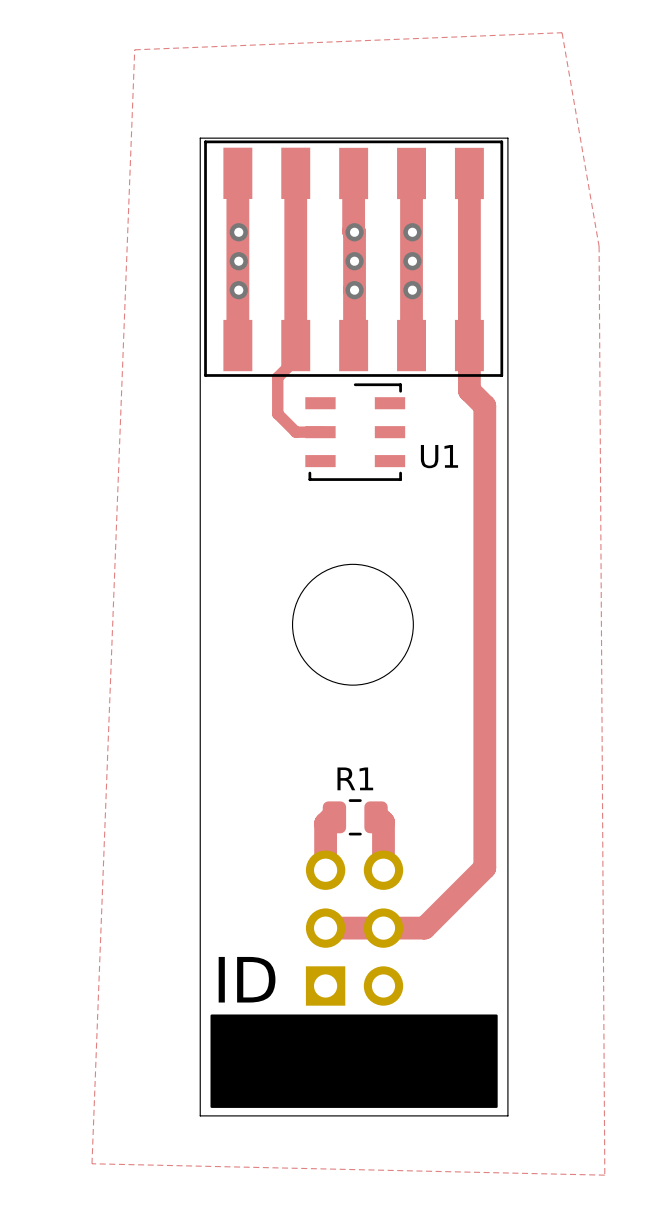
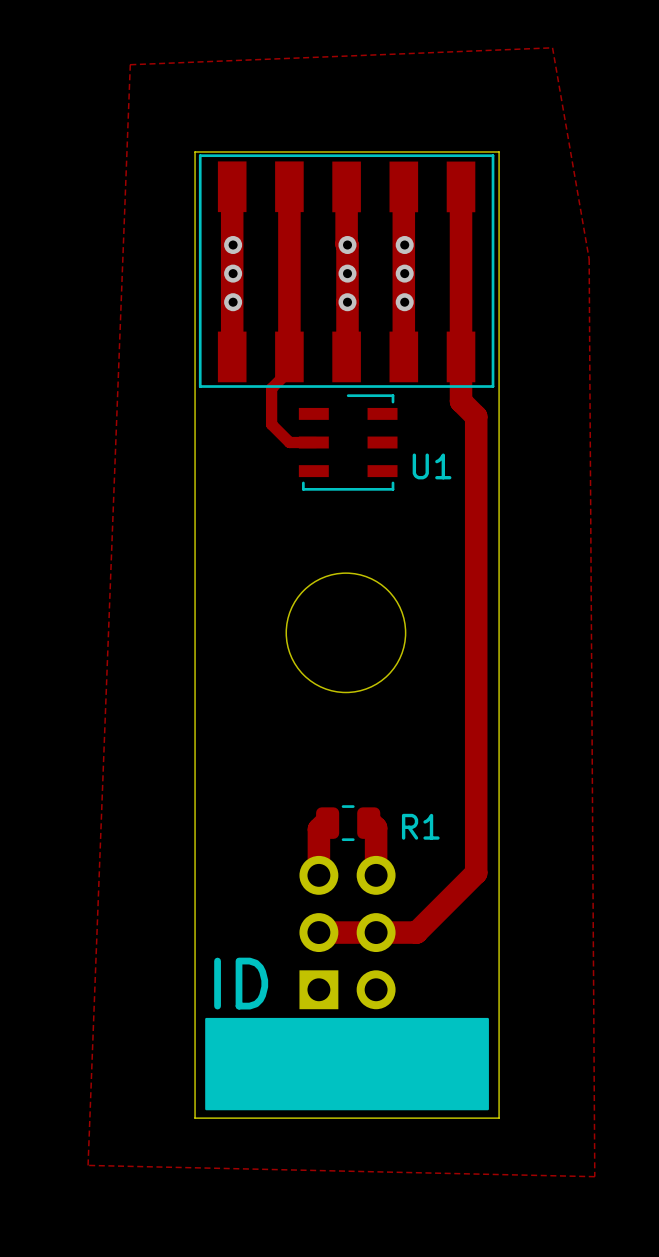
R1 name position: R1 (355, 778) -> R1 (420, 826)

